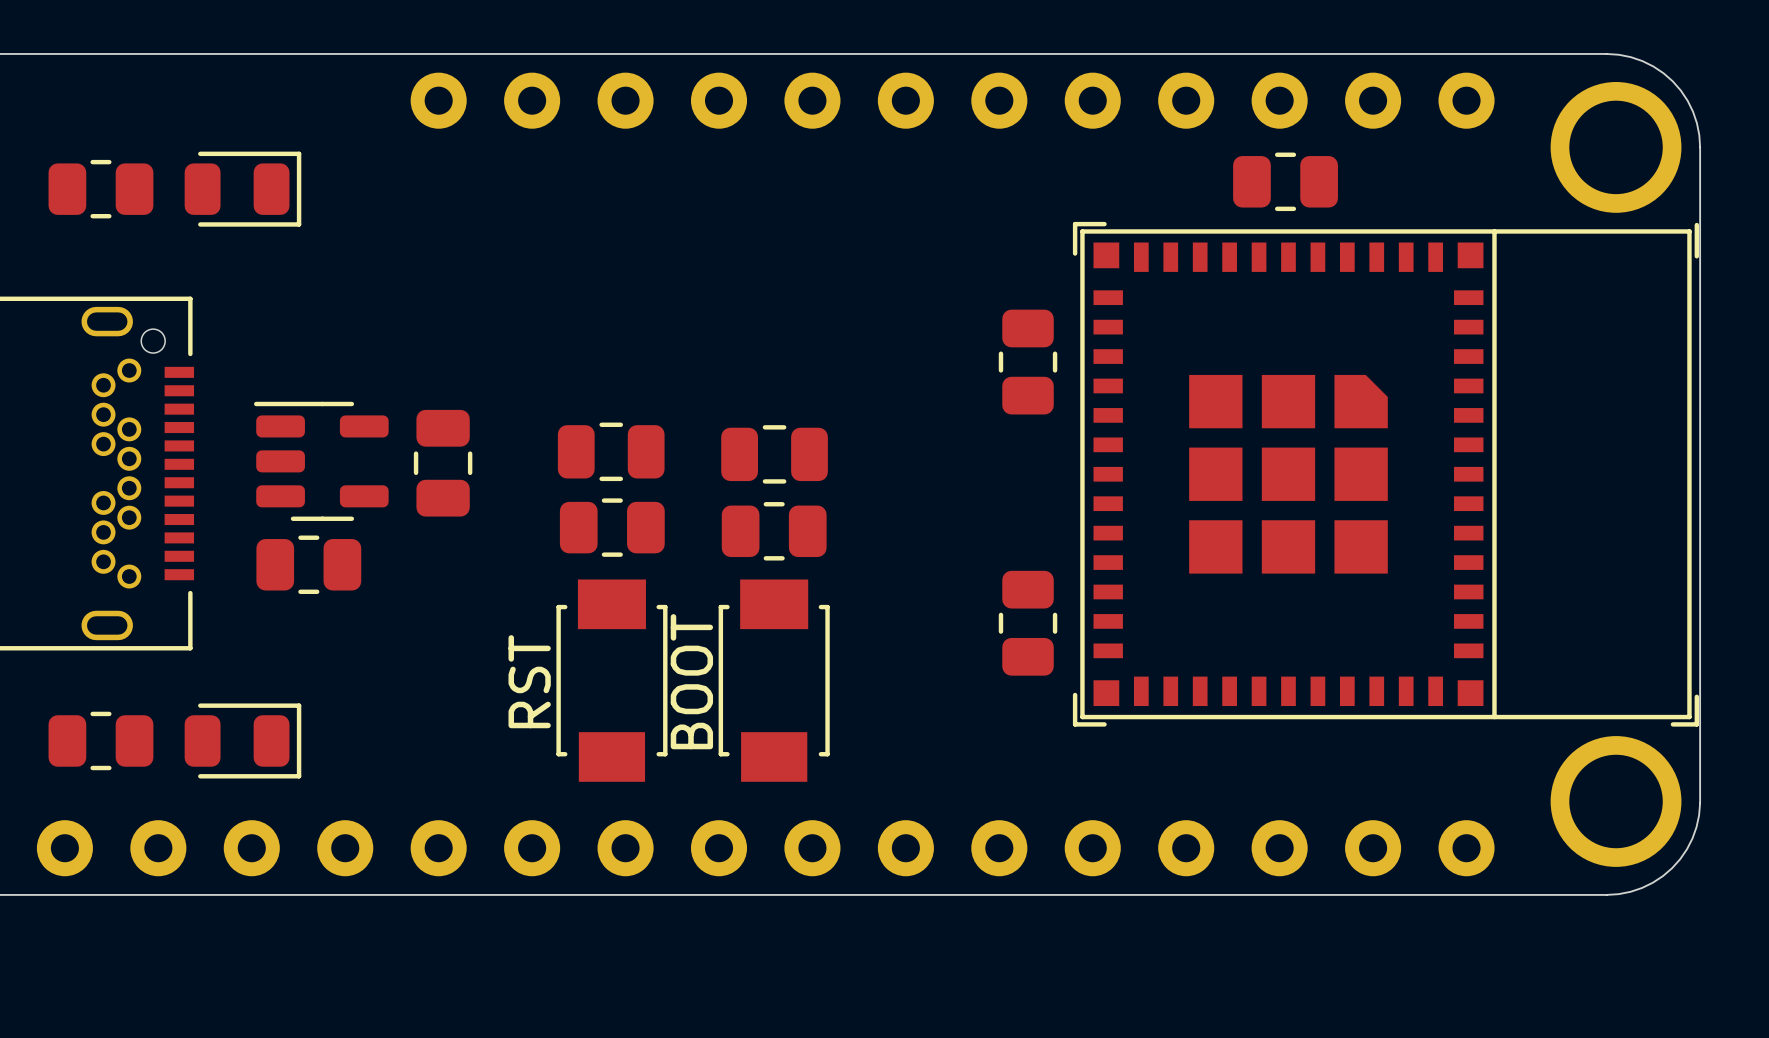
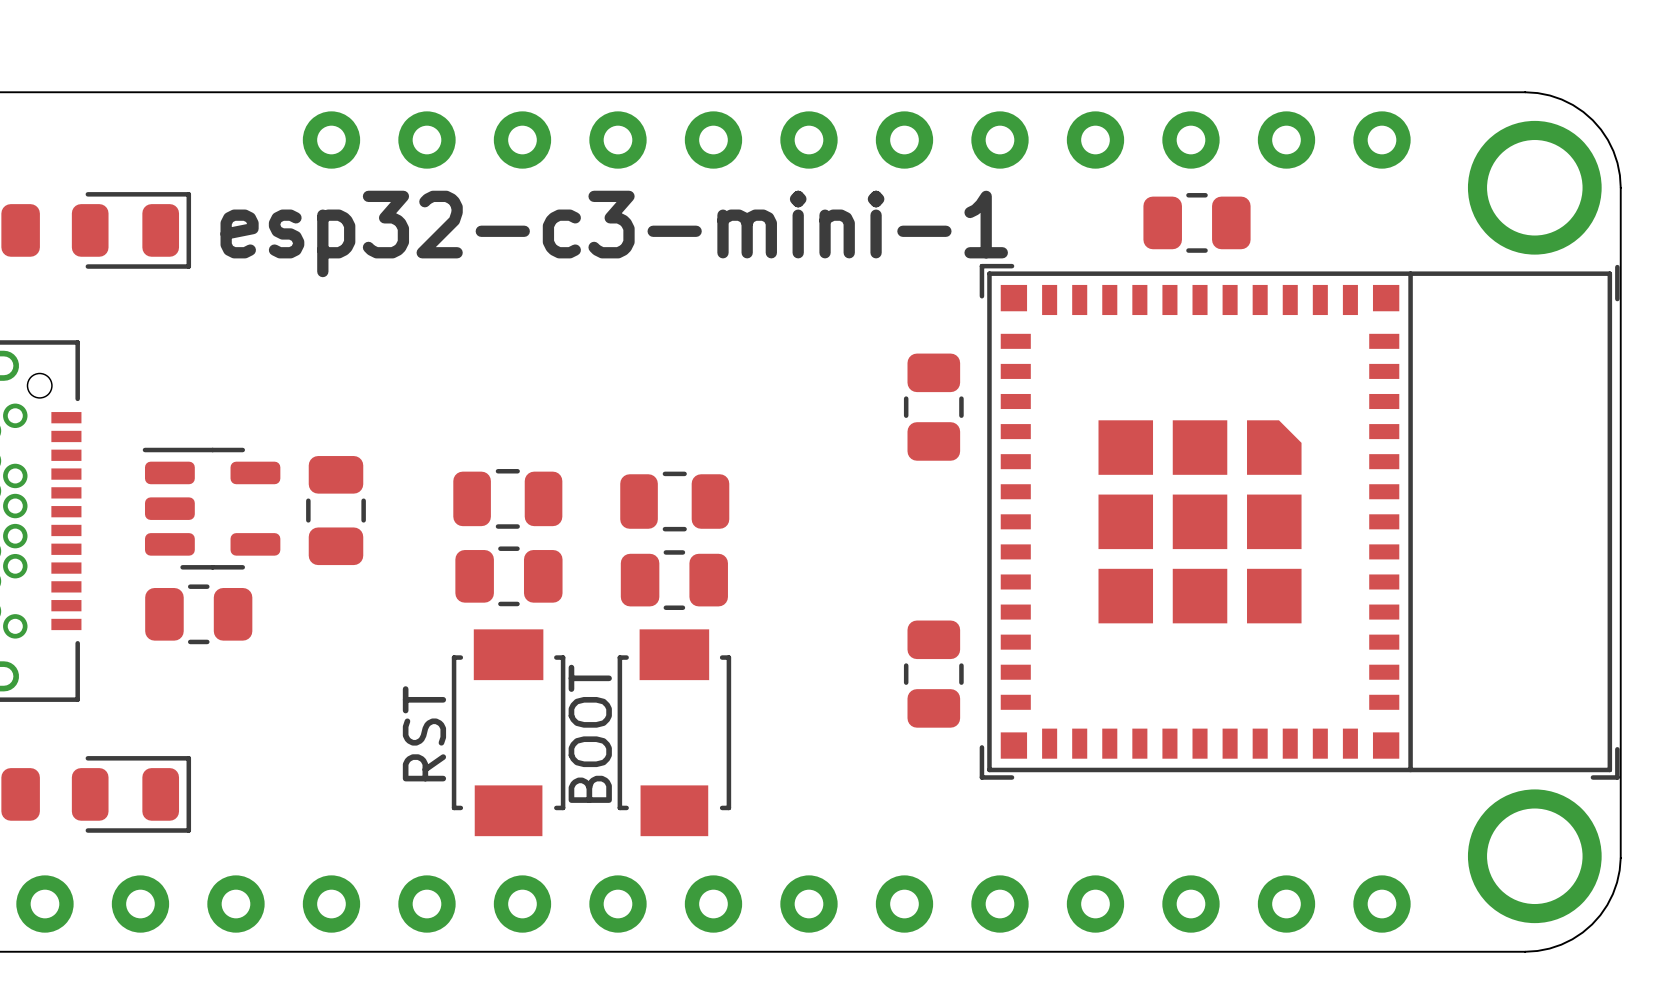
text: none -> esp32-c3-mini-1 (614, 233)

